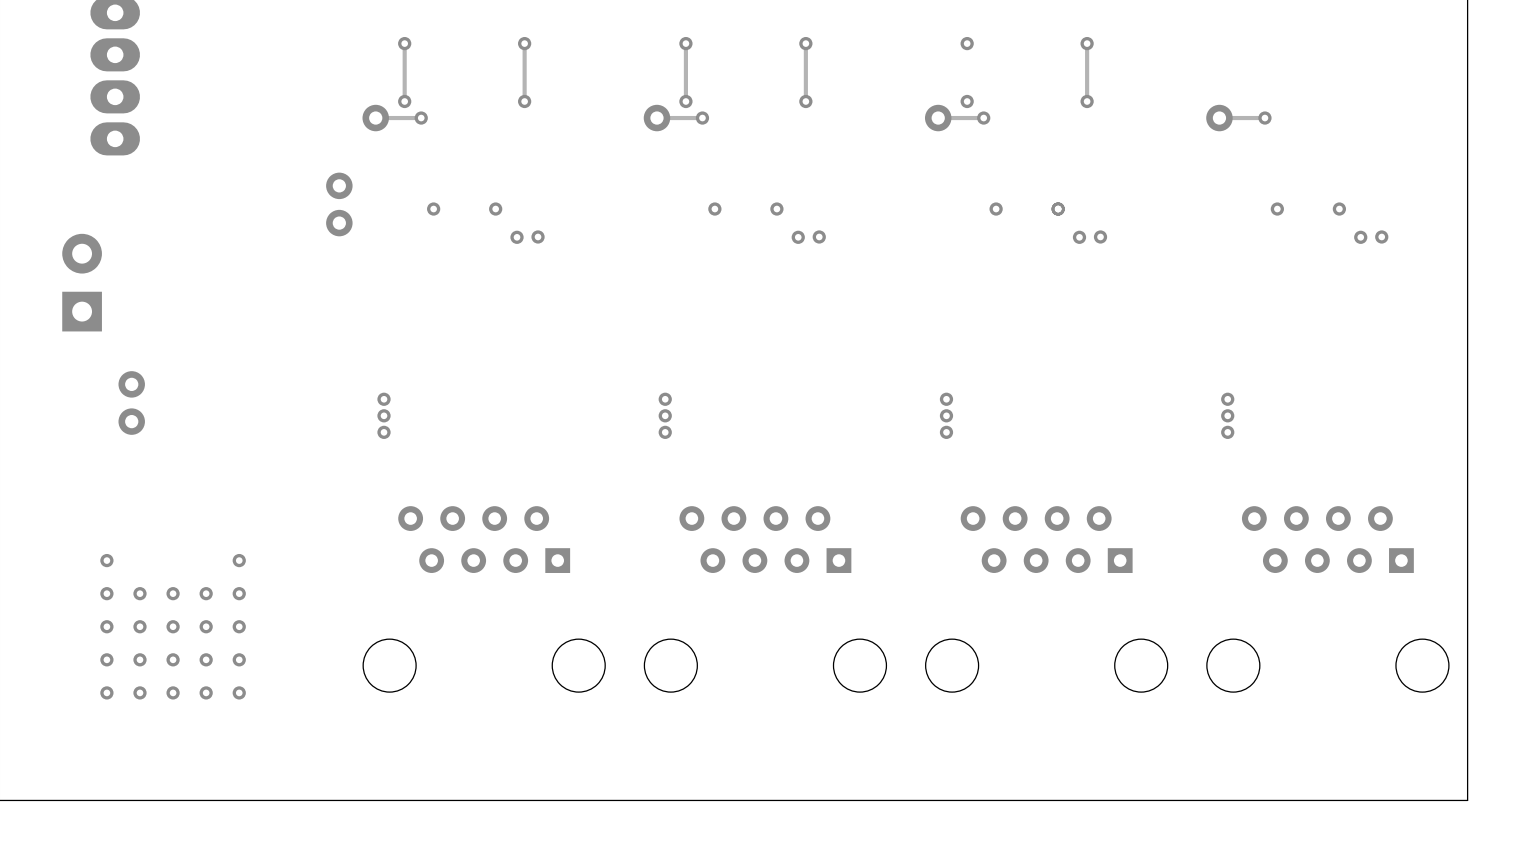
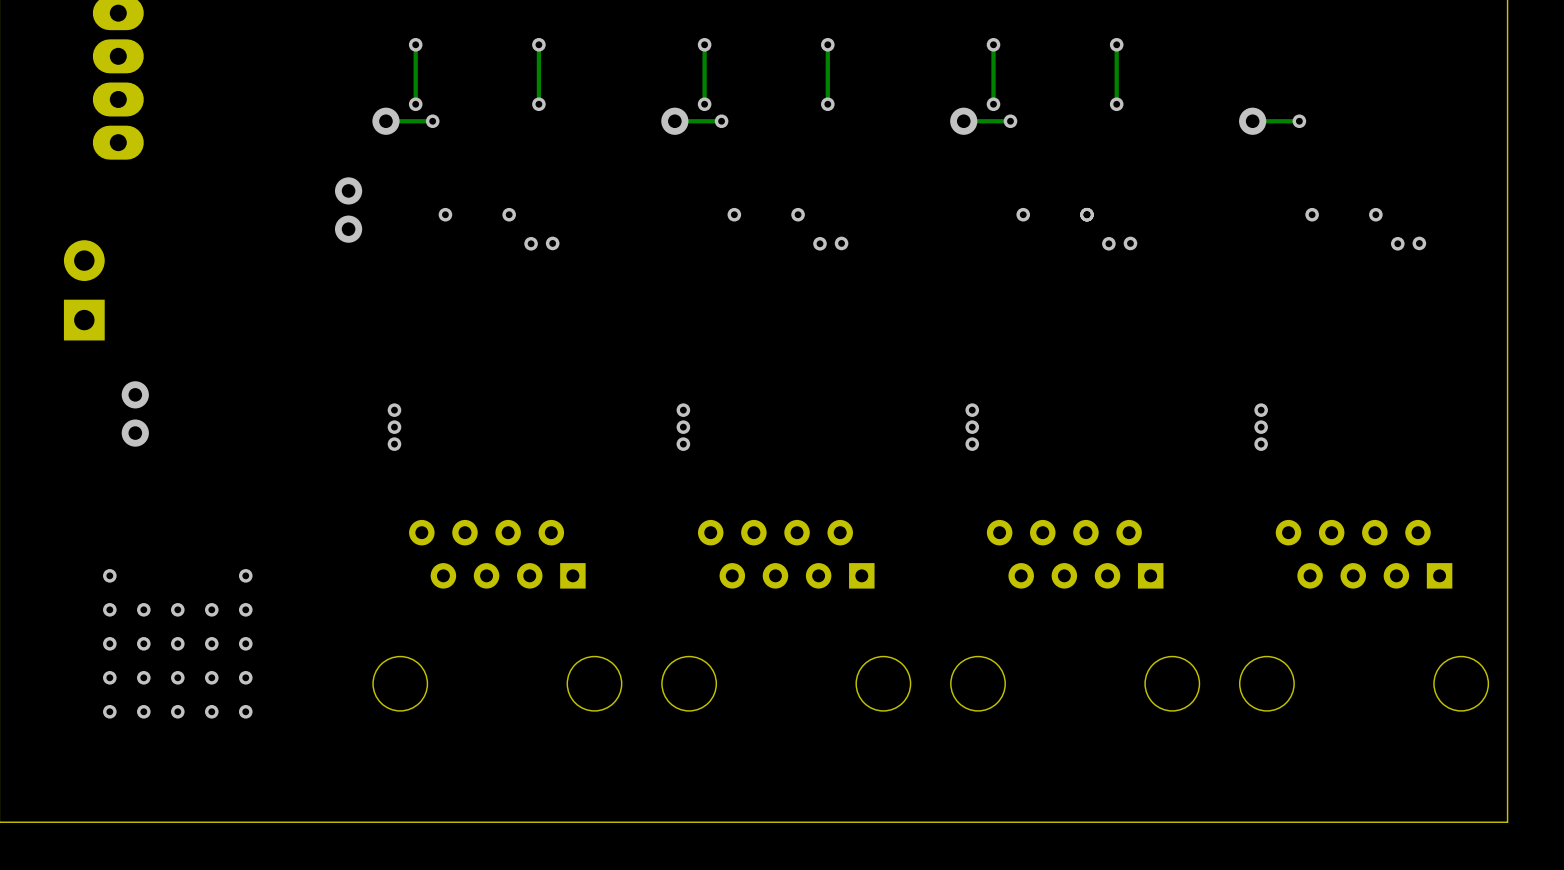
track: none -> (993, 44) (993, 104)

